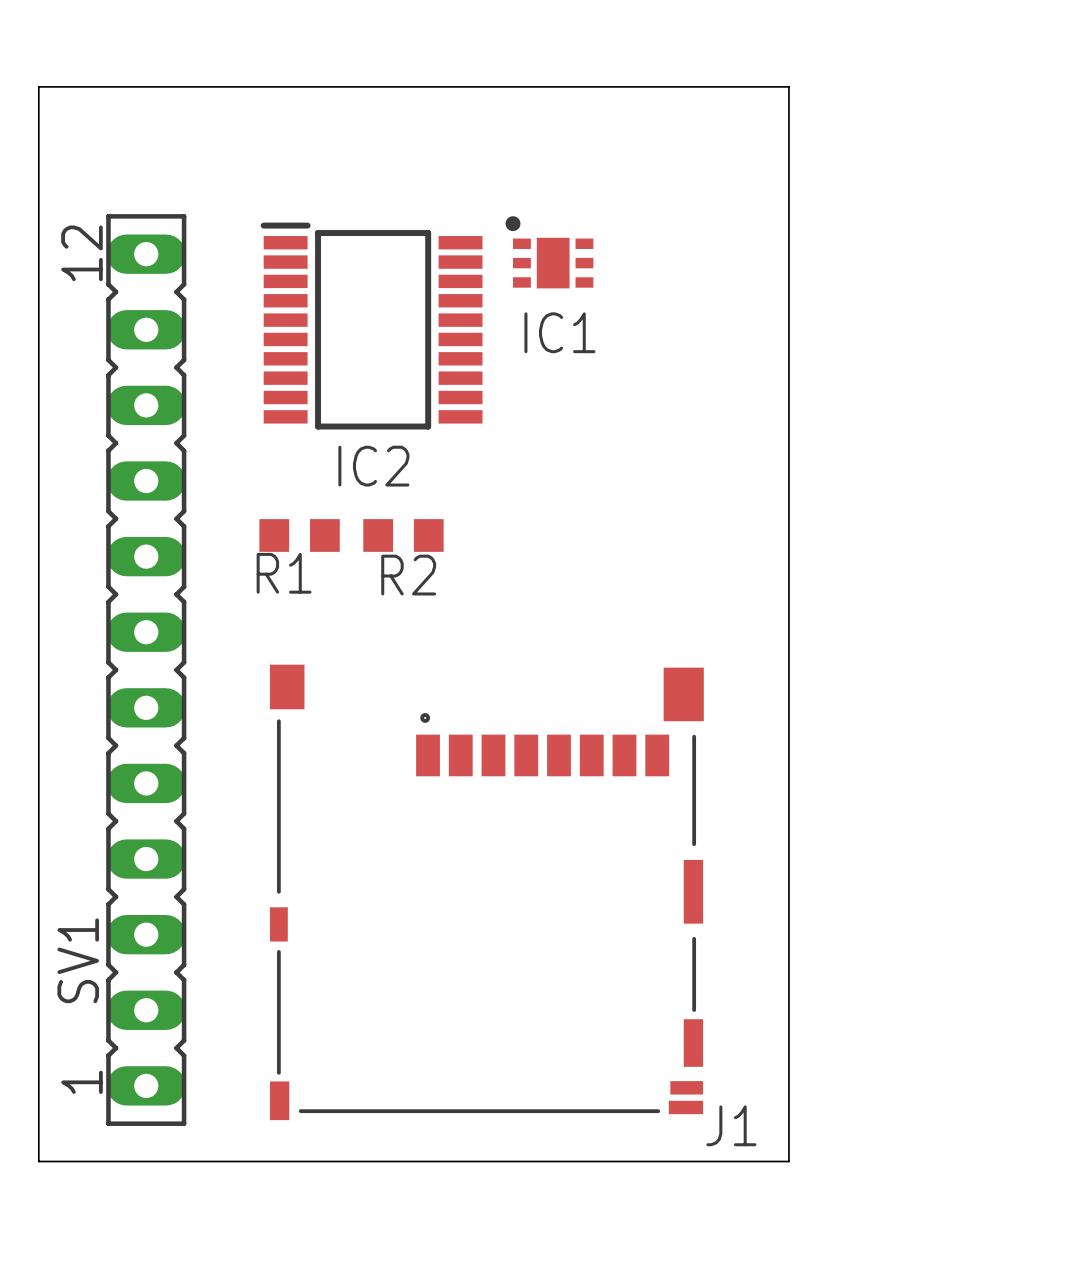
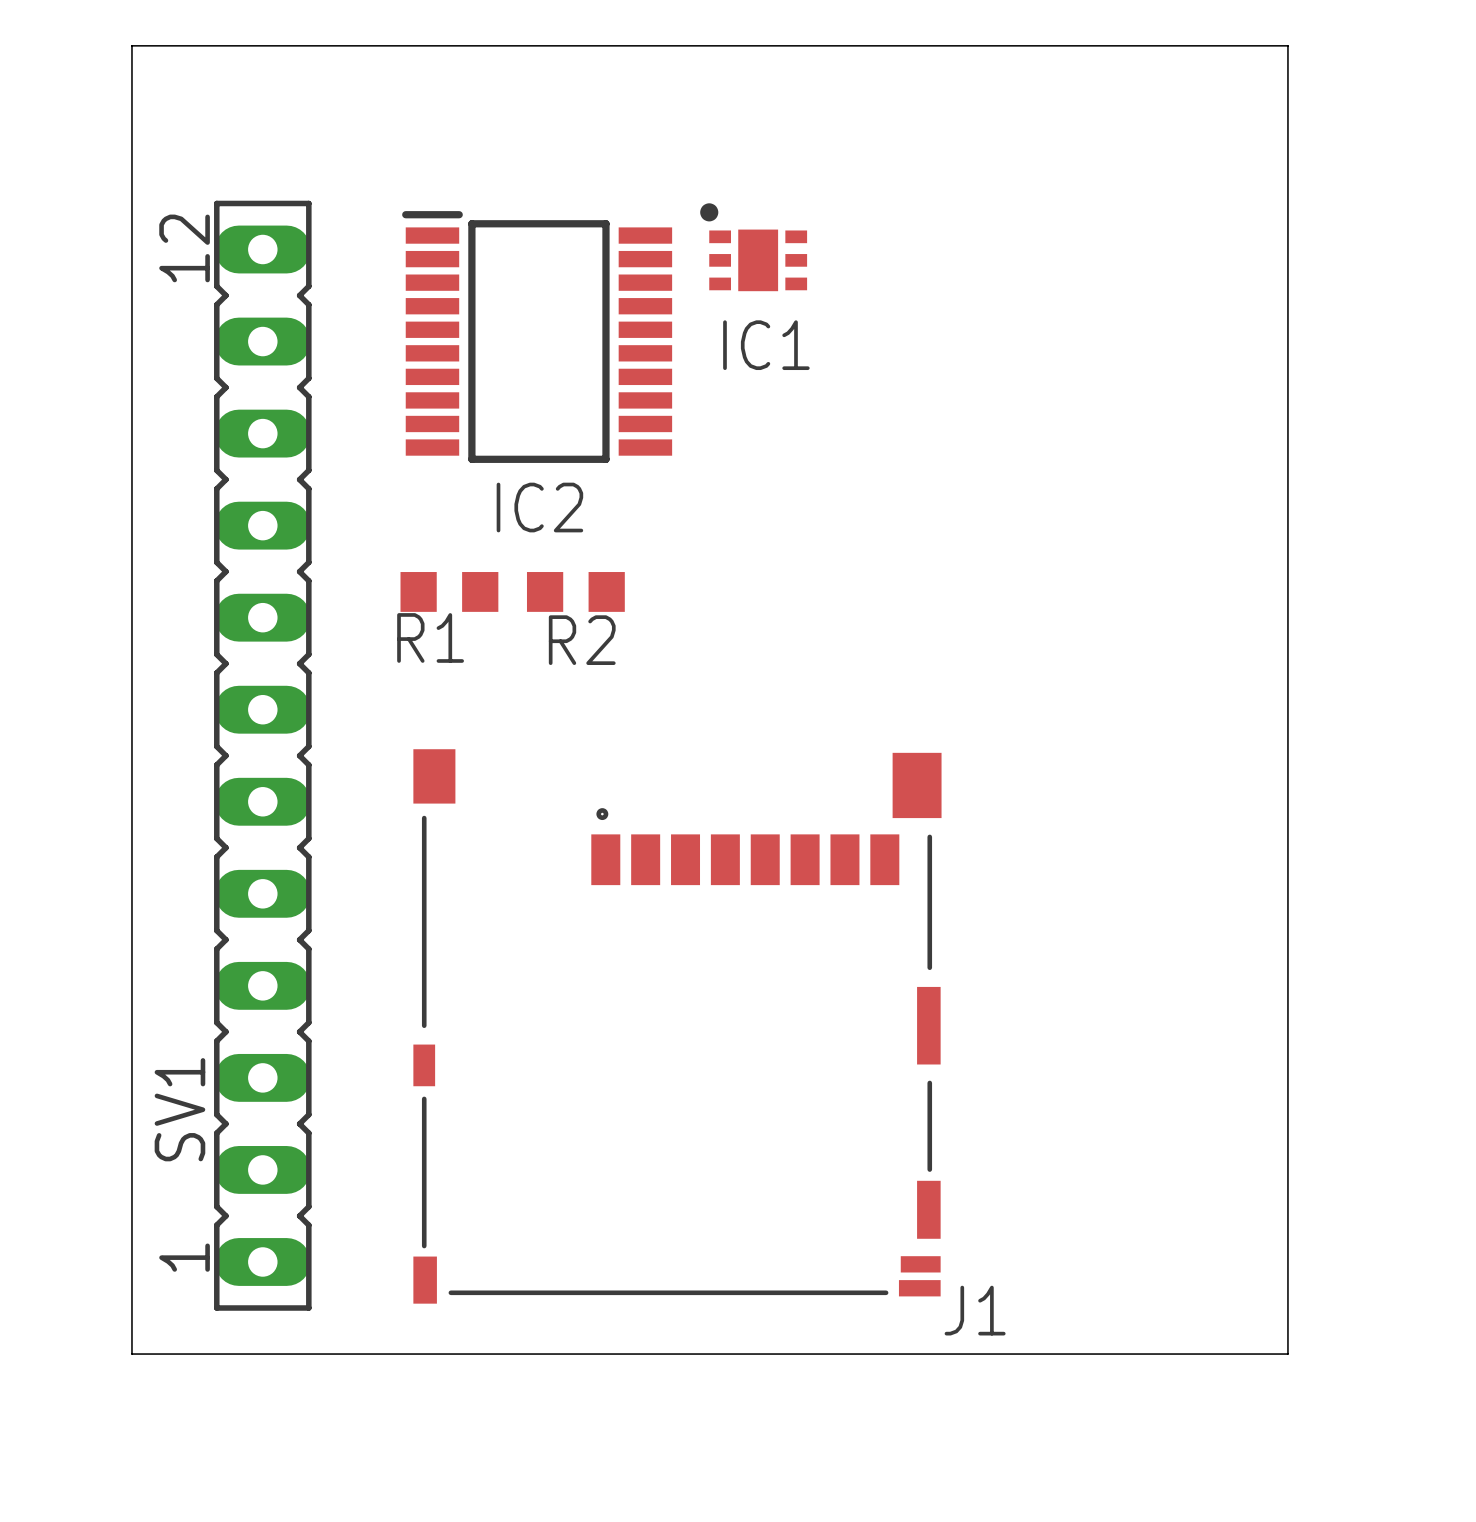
board edge: (788, 86) (788, 1161) -> (1045, 45) (1287, 45) (1287, 1354) (1045, 1354)

